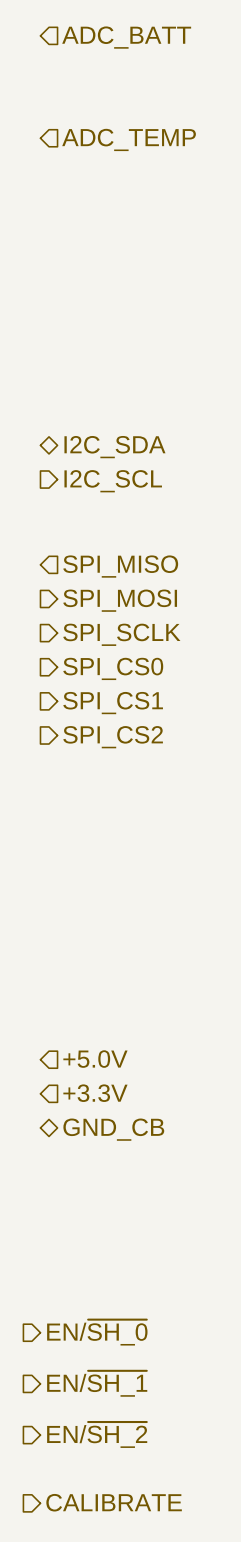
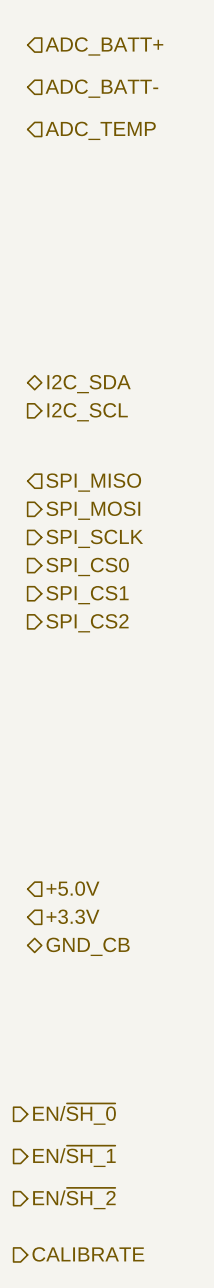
hierarchical label: ADC_BATT (126, 37) -> ADC_BATT+ (104, 46)
hierarchical label: none -> ADC_BATT- (101, 88)

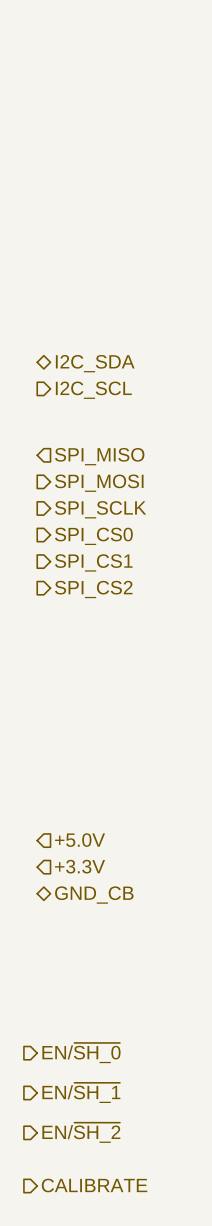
hierarchical label: ADC_BATT+ (104, 46) -> none
hierarchical label: ADC_BATT- (101, 88) -> none
hierarchical label: ADC_TEMP (100, 130) -> none

